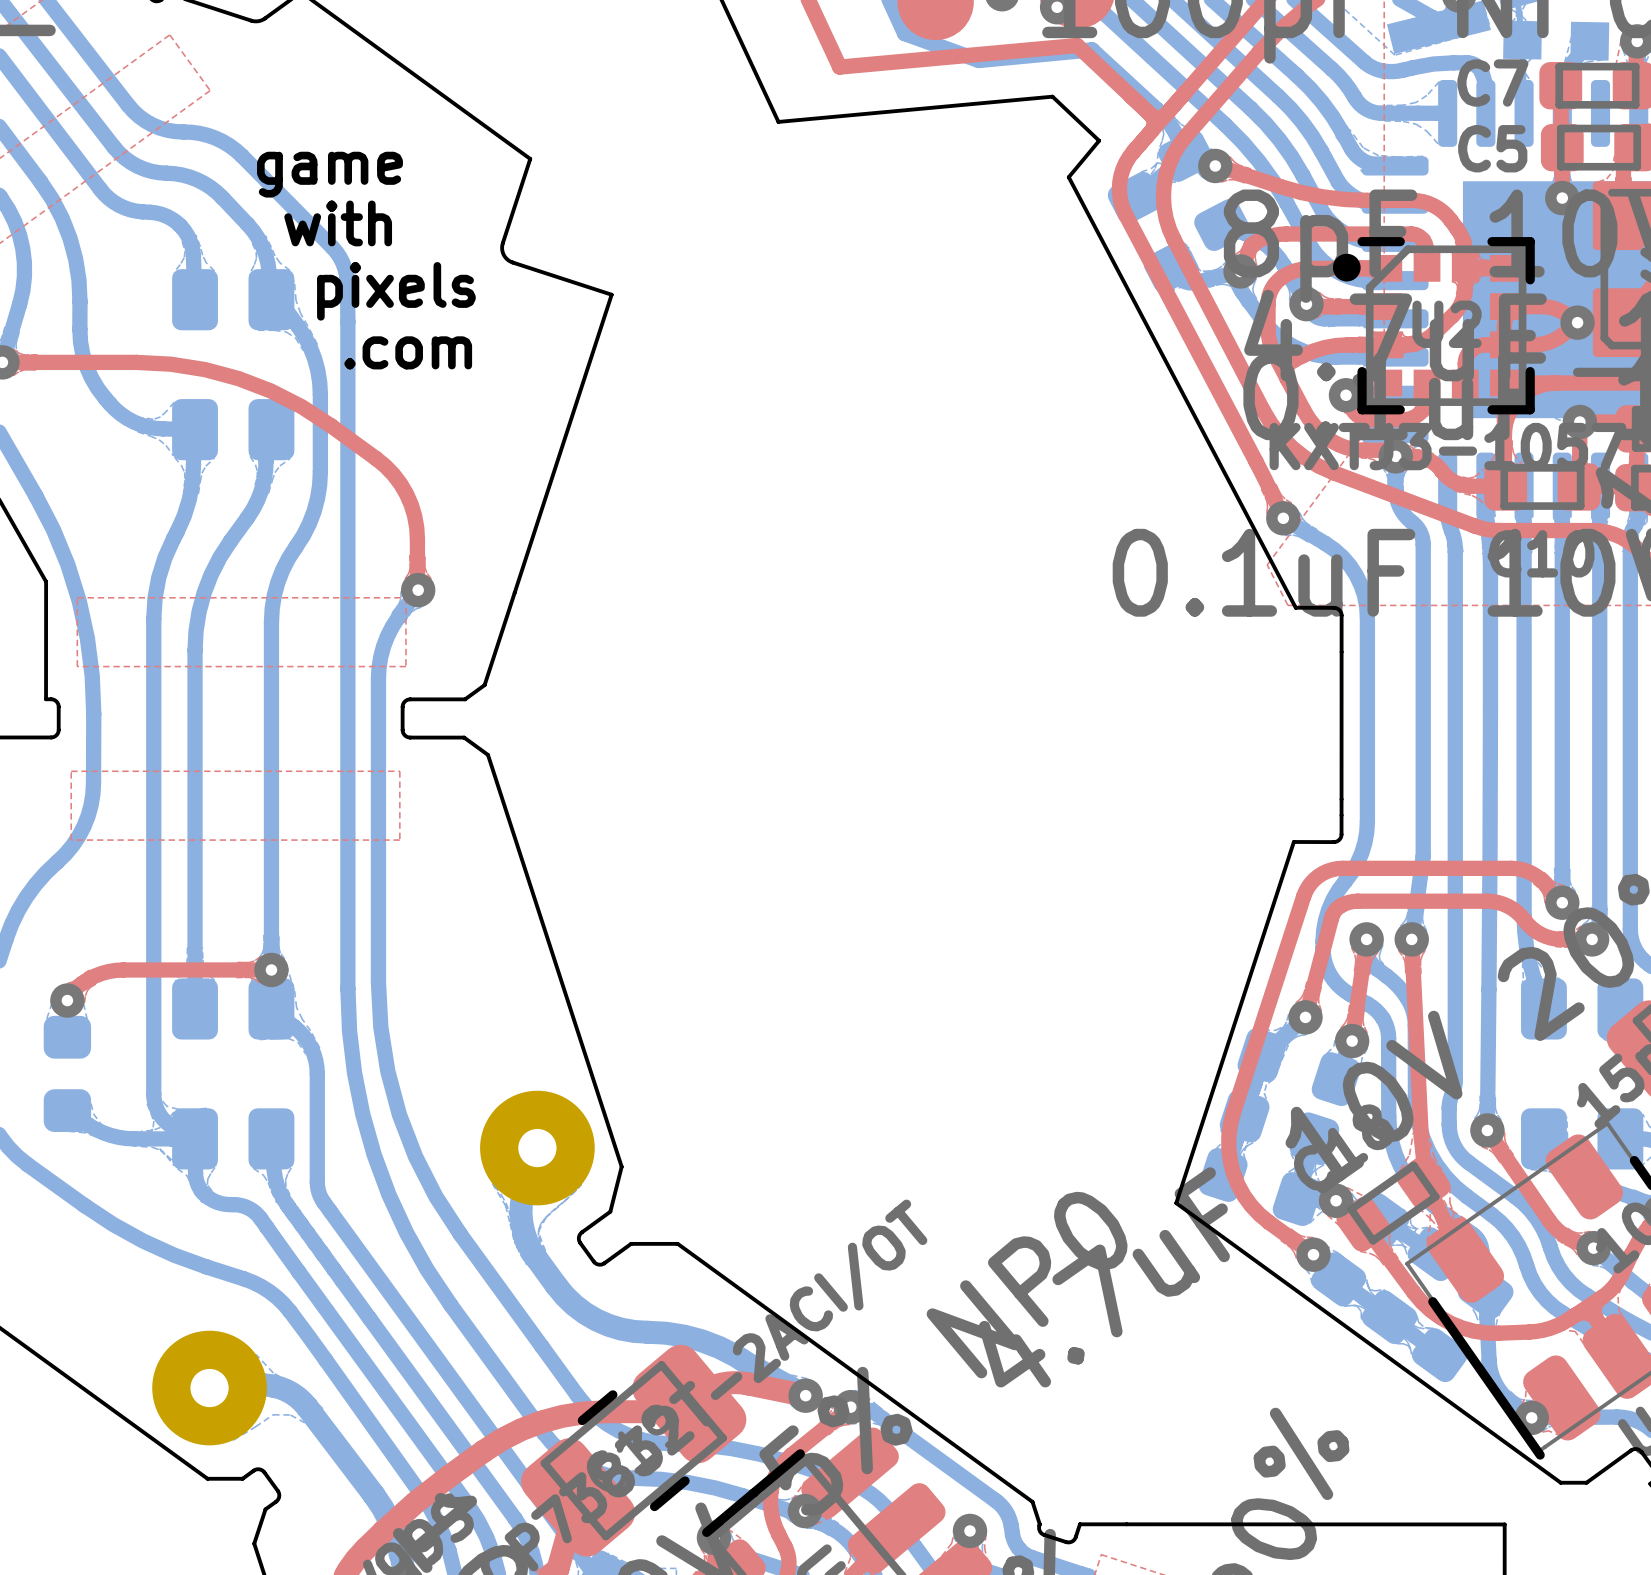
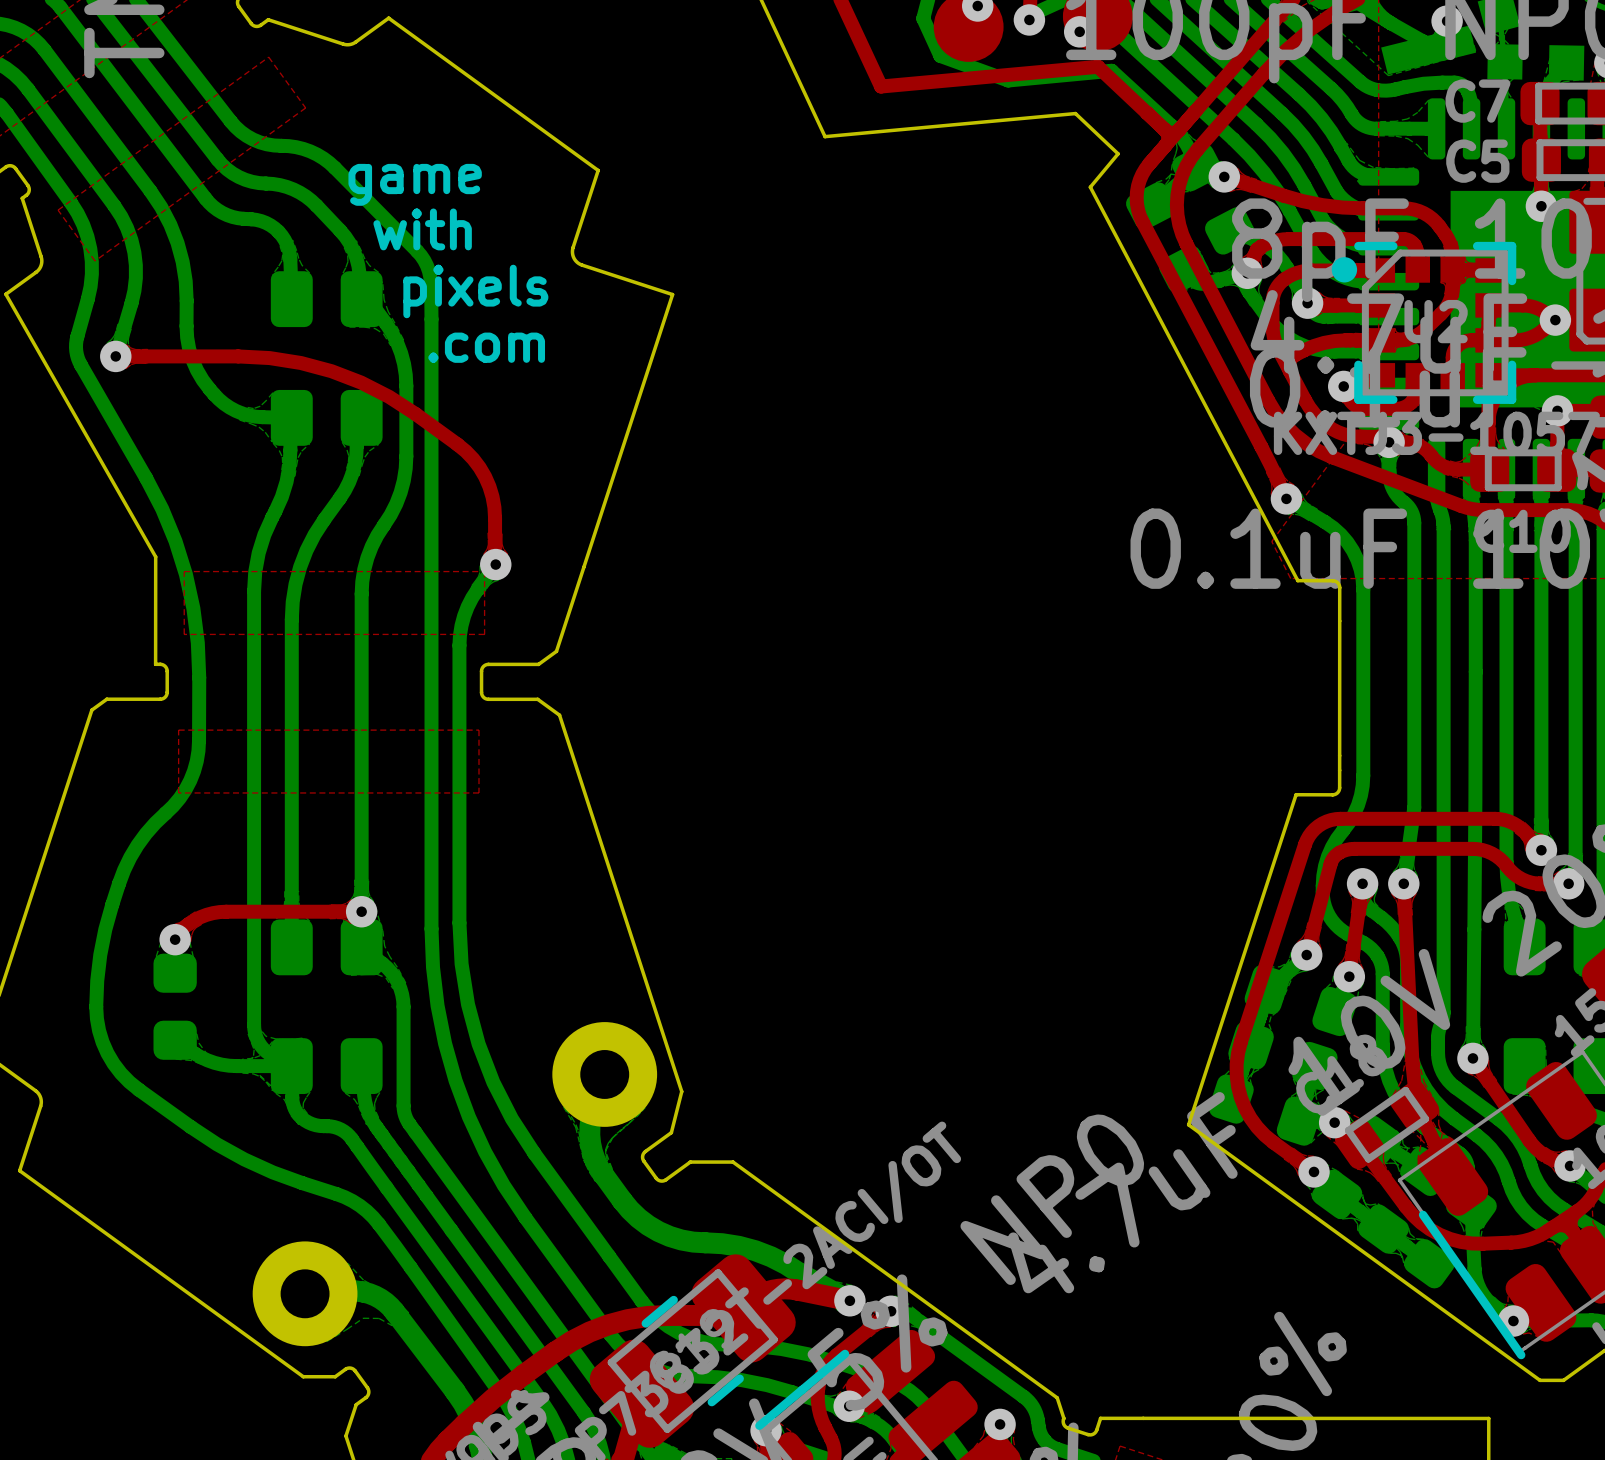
part footprint: [480, 1090, 595, 1206] -> [552, 1022, 658, 1127]
part footprint: [152, 1330, 267, 1446] -> [252, 1241, 358, 1347]

